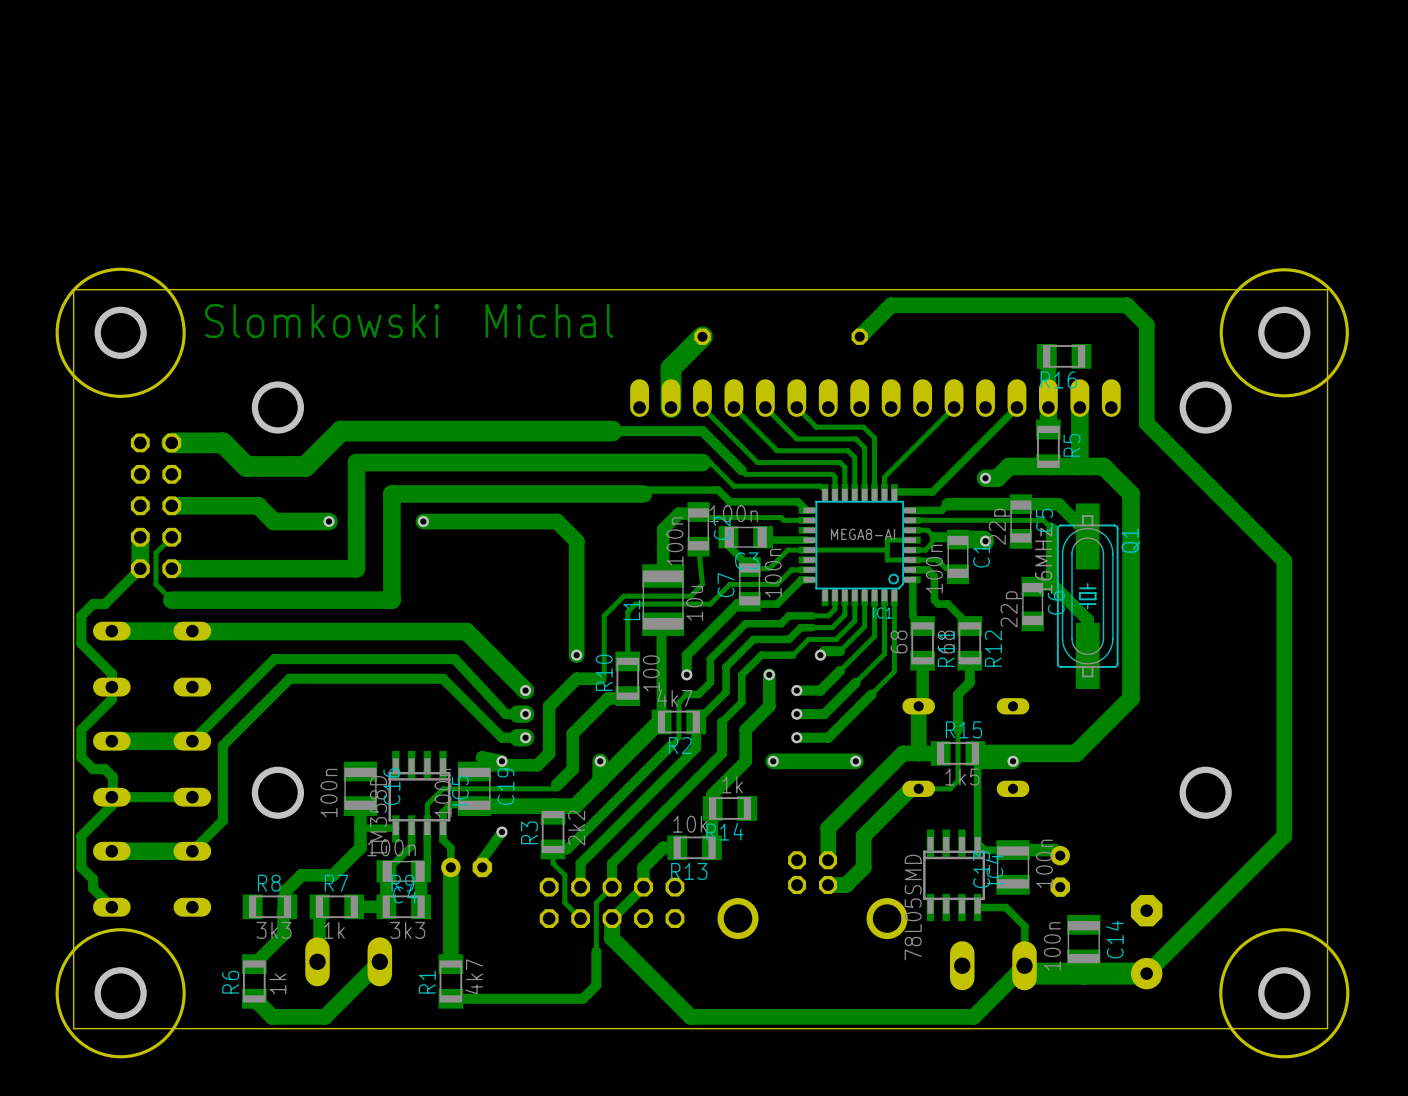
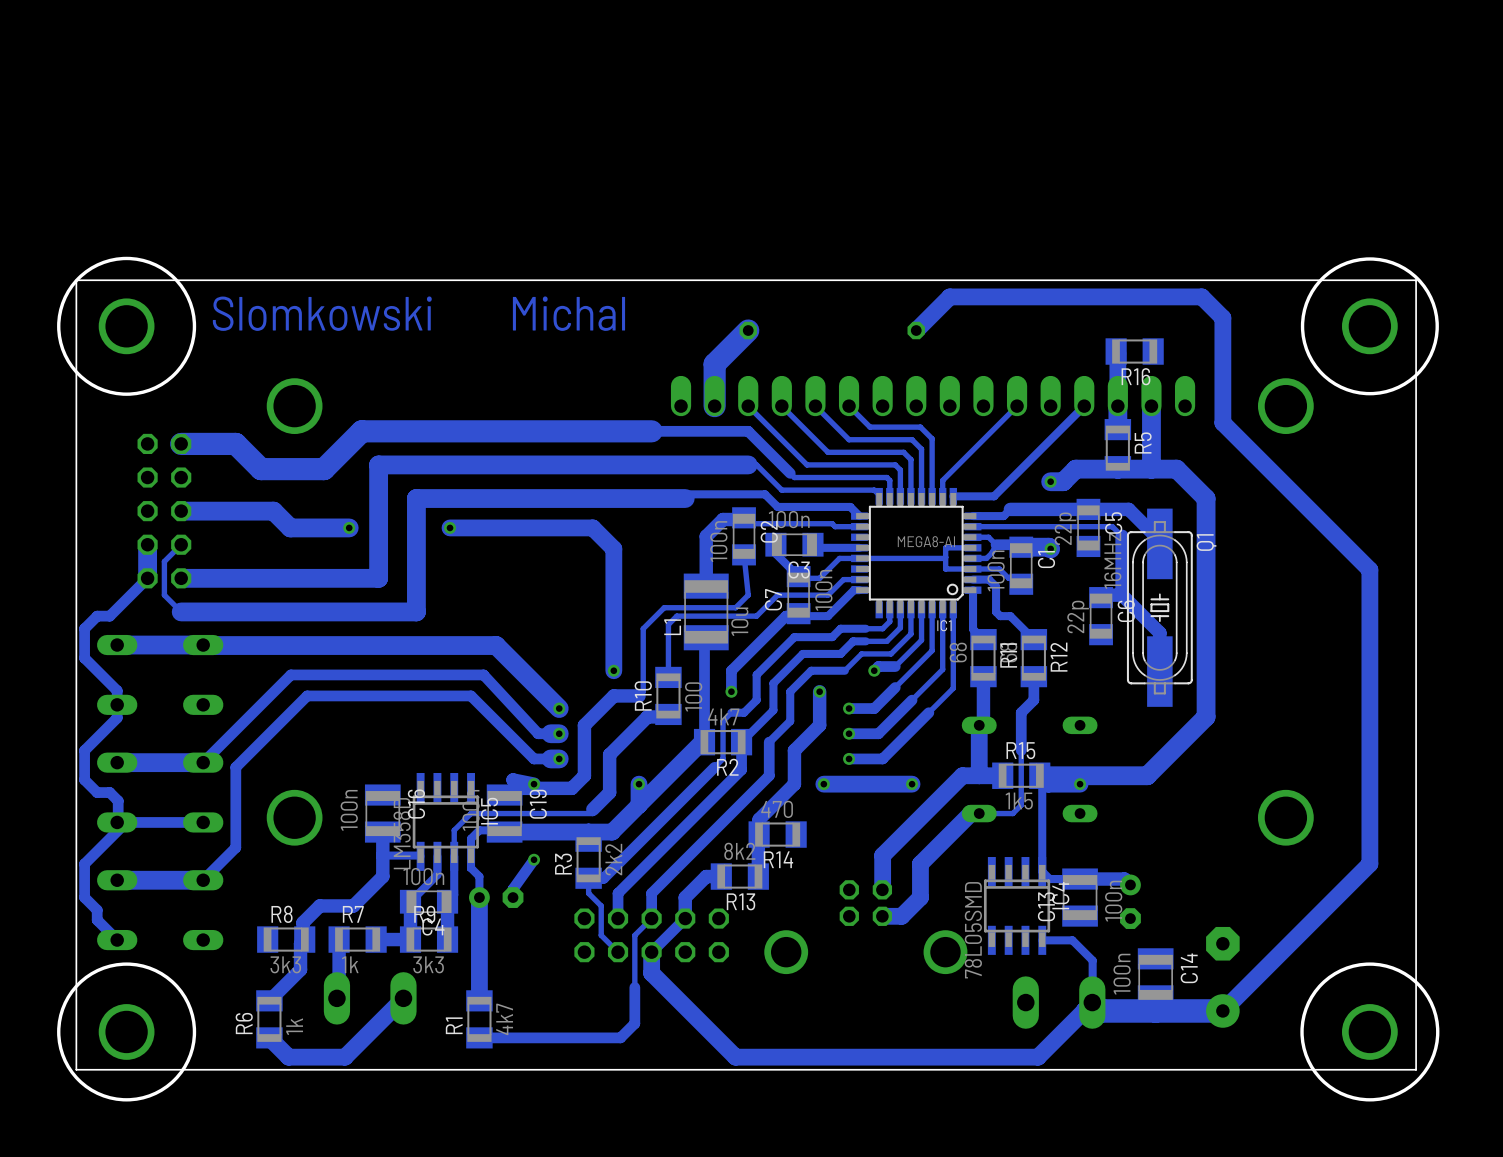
R14 value: 1k (732, 784) -> 470 (777, 809)
R13 value: 10k (690, 824) -> 8k2 (739, 851)

